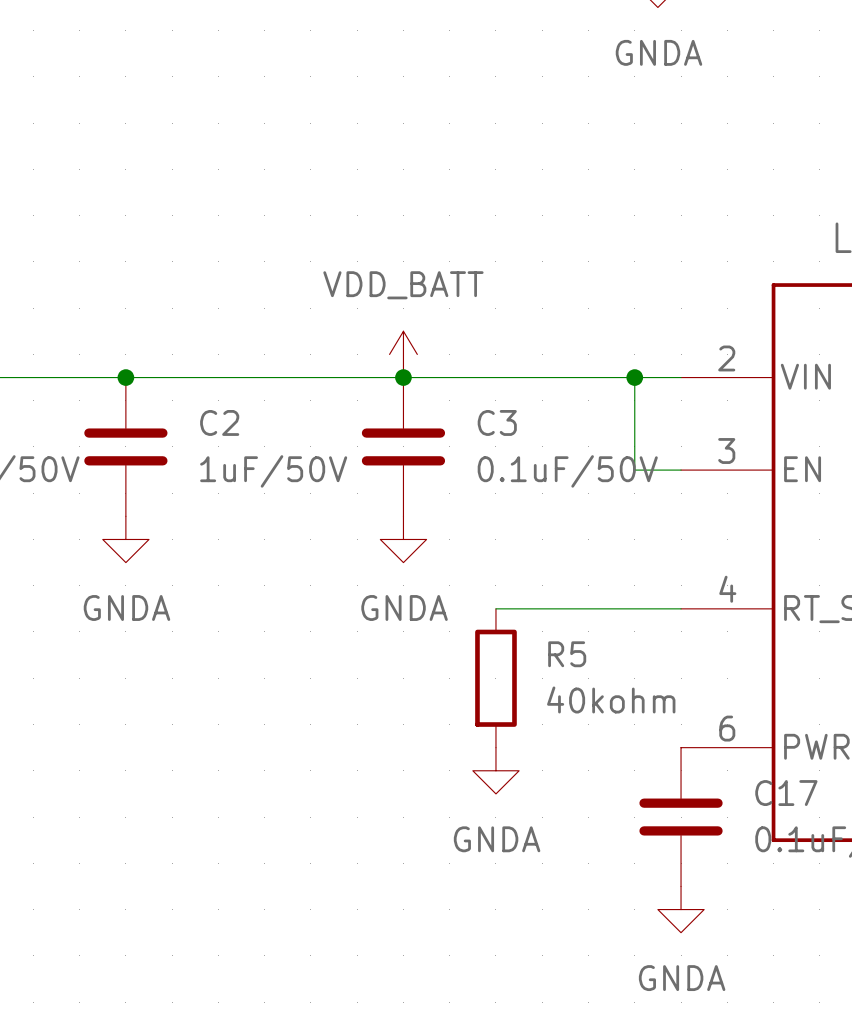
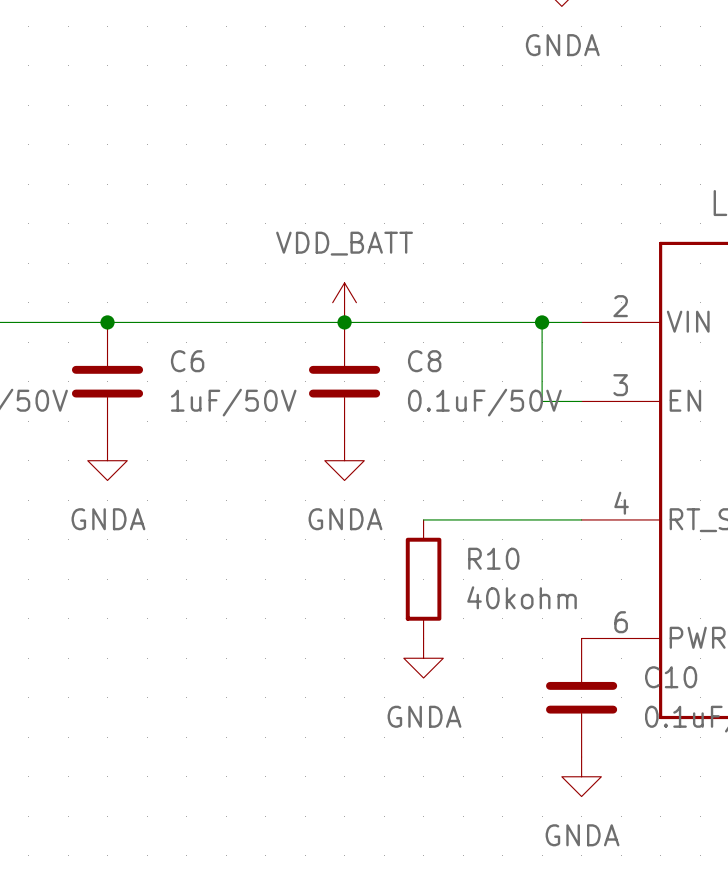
C2 name: C2 (219, 422) -> C6 (187, 361)
C3 name: C3 (497, 422) -> C8 (424, 361)
R5 name: R5 (567, 654) -> R10 (493, 558)
C17 name: C17 (786, 793) -> C10 (671, 677)

